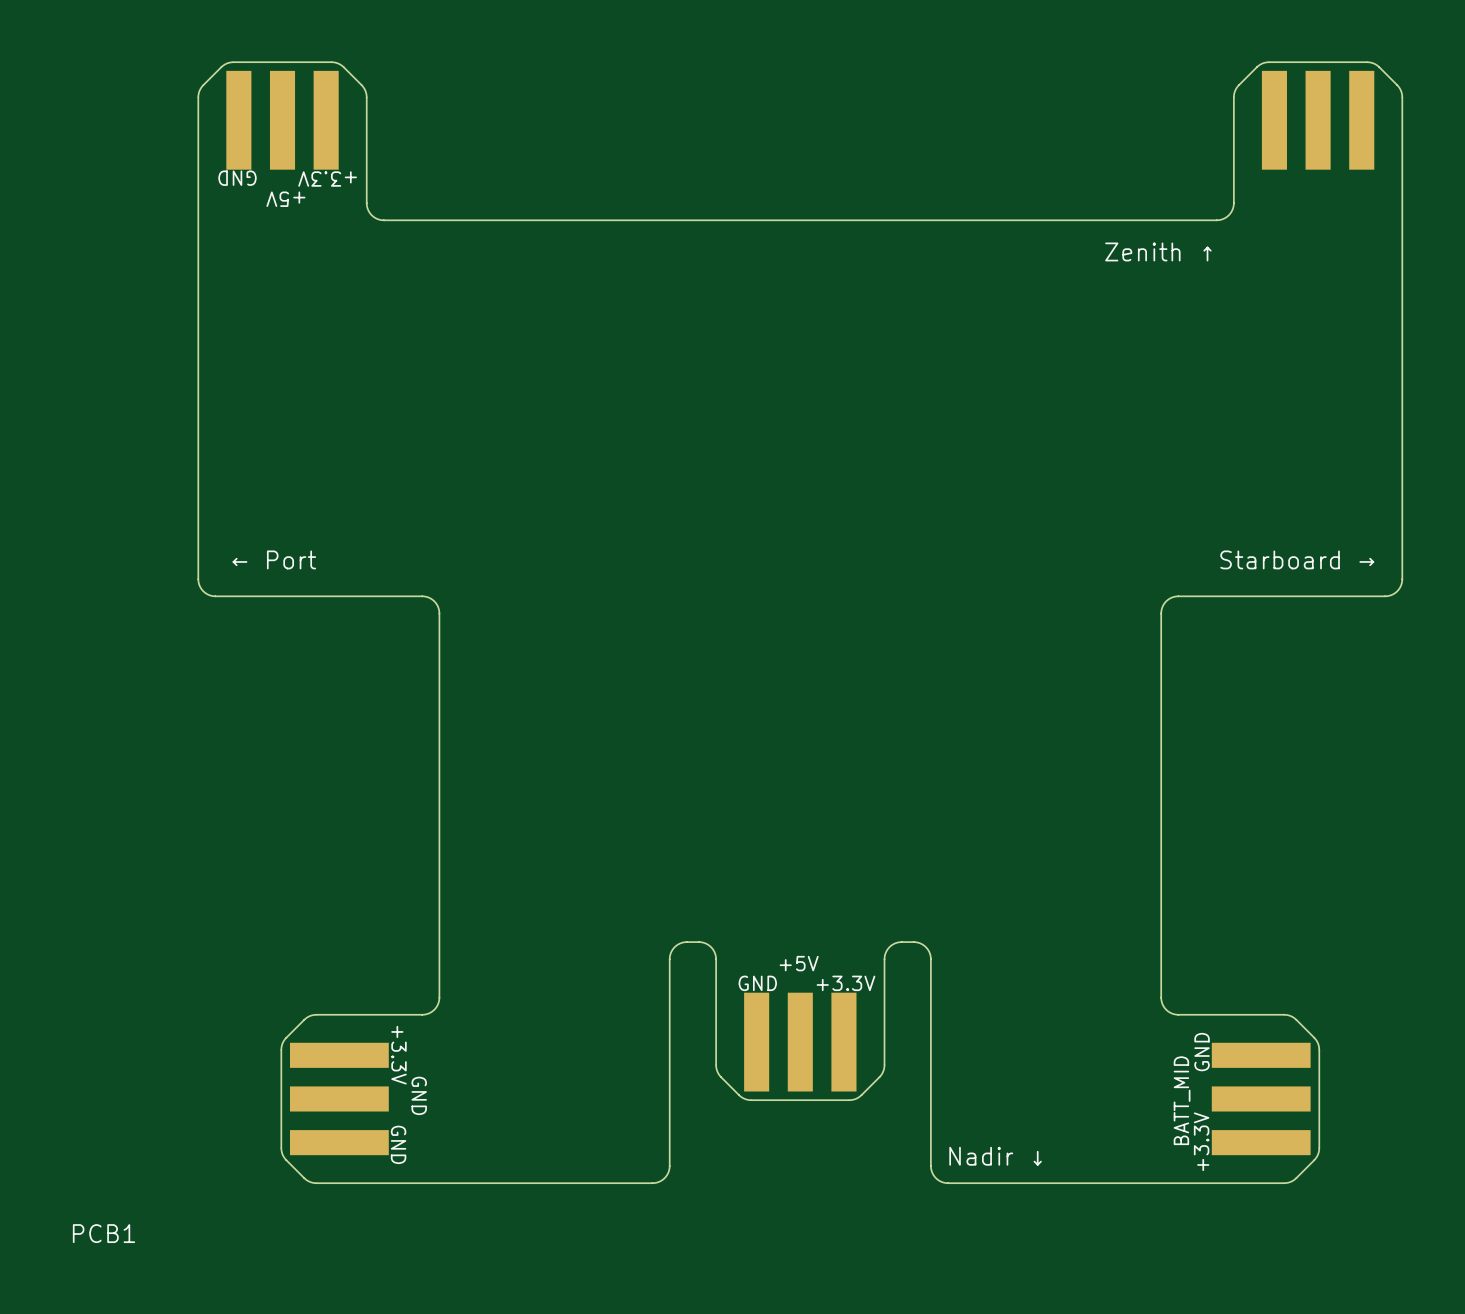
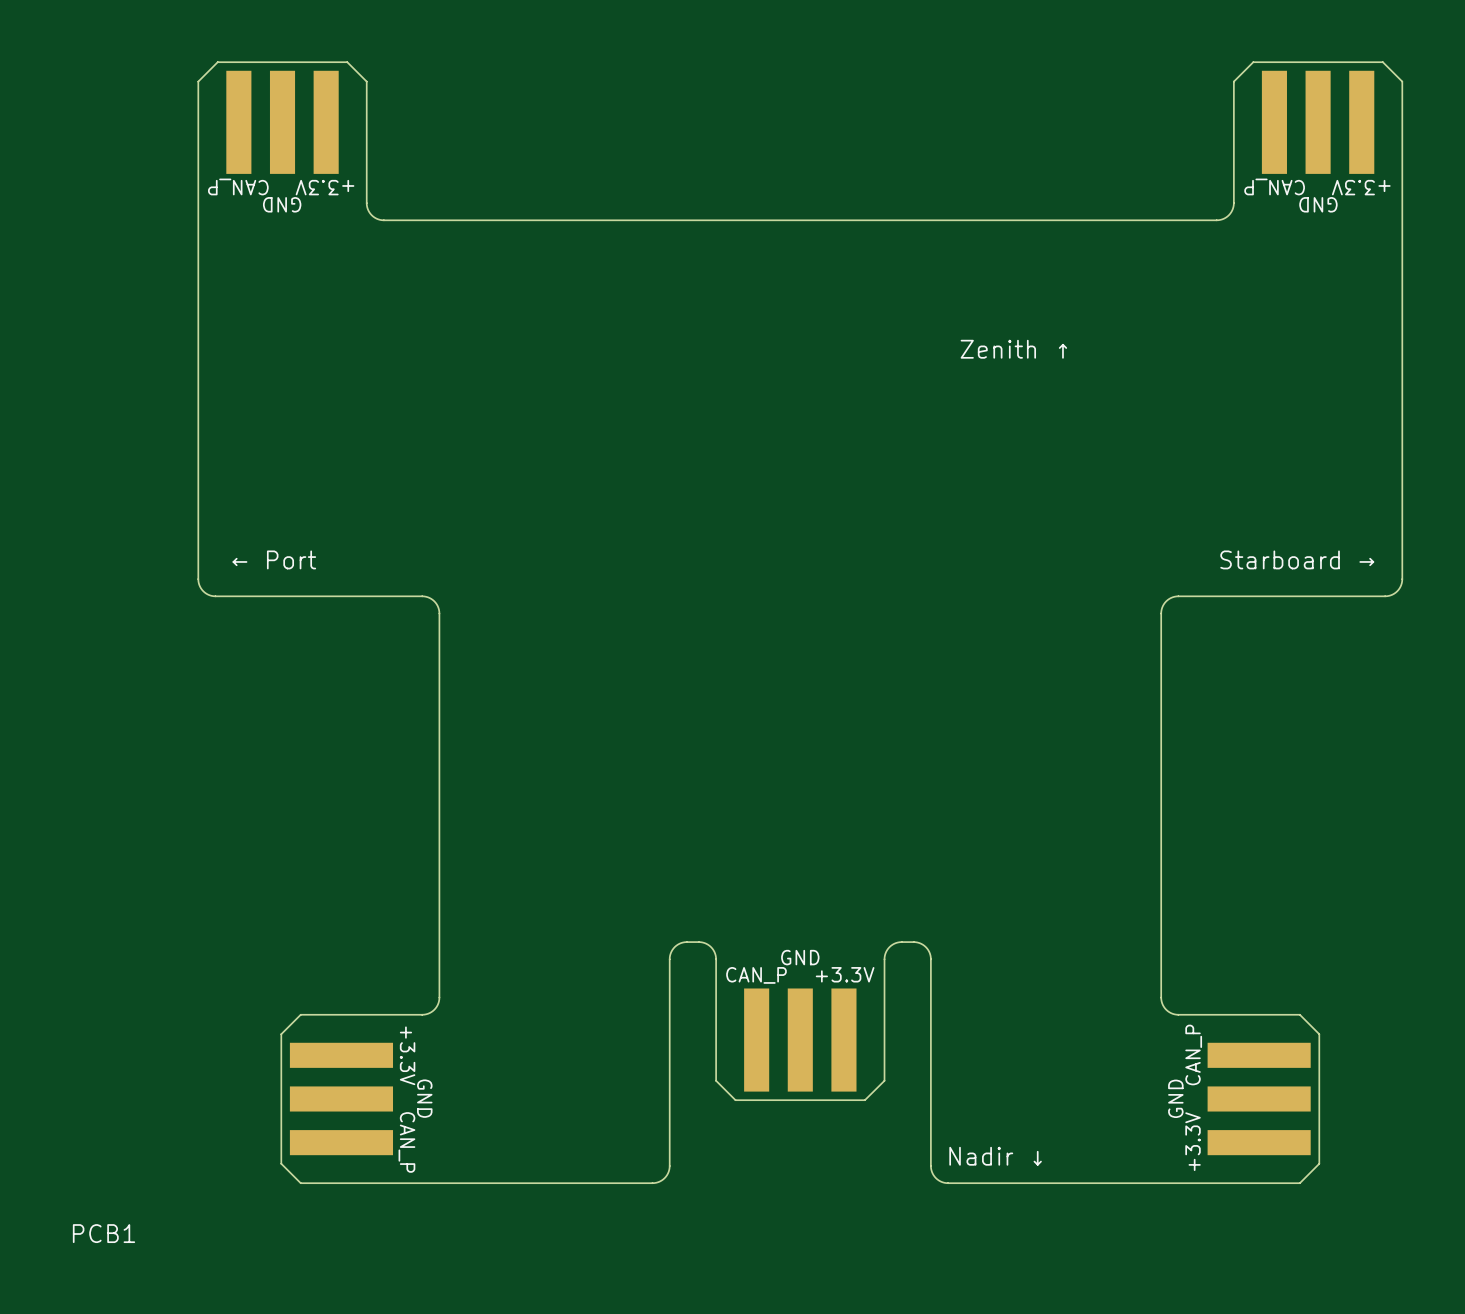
PCB1 footprint: [197, 61, 1404, 1185] -> [197, 61, 1403, 1184]
text: GND (237, 178) -> none
text: +3.3V (327, 179) -> none
text: +5V (285, 199) -> none
text: +5V (799, 963) -> none
text: GND (757, 983) -> none
text: +3.3V (845, 983) -> none
text: GND (1202, 1052) -> none
text: +3.3V (398, 1055) -> none
text: GND (419, 1095) -> none
text: BATT_MID (1182, 1100) -> none
text: +3.3V (1201, 1141) -> none
text: GND (398, 1144) -> none

